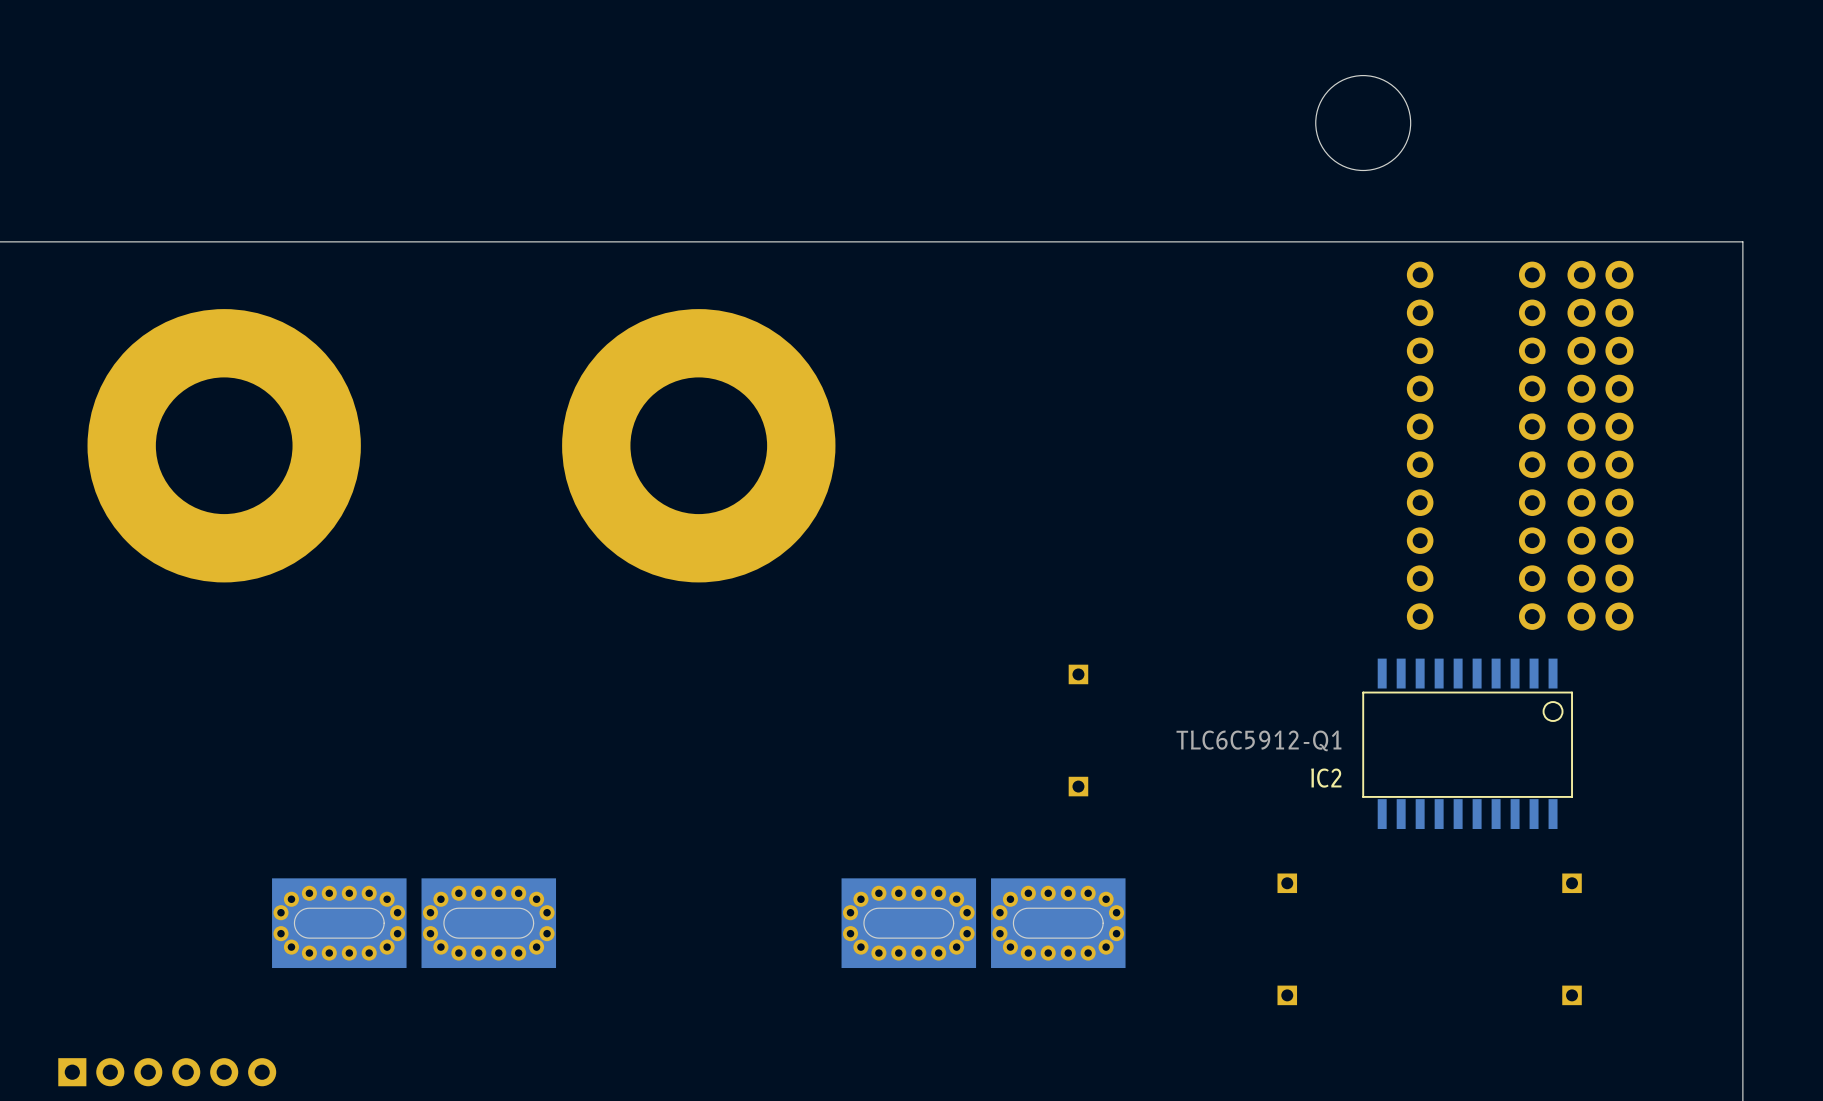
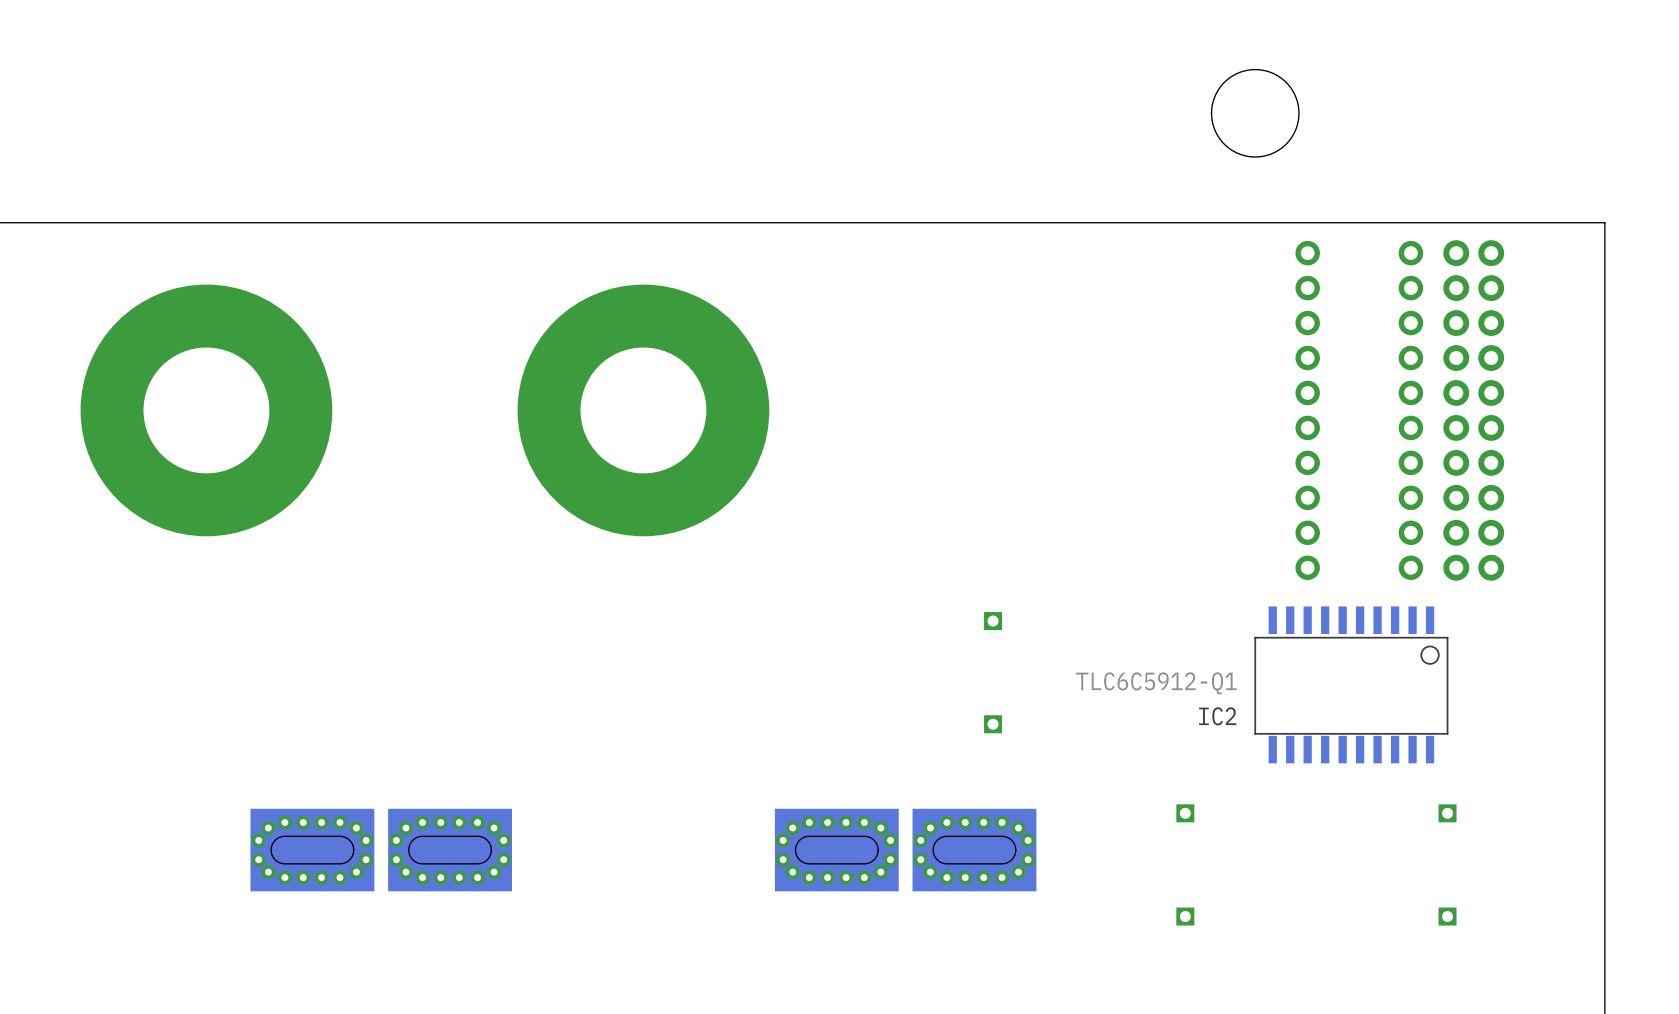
part: (167, 1072) -> none

